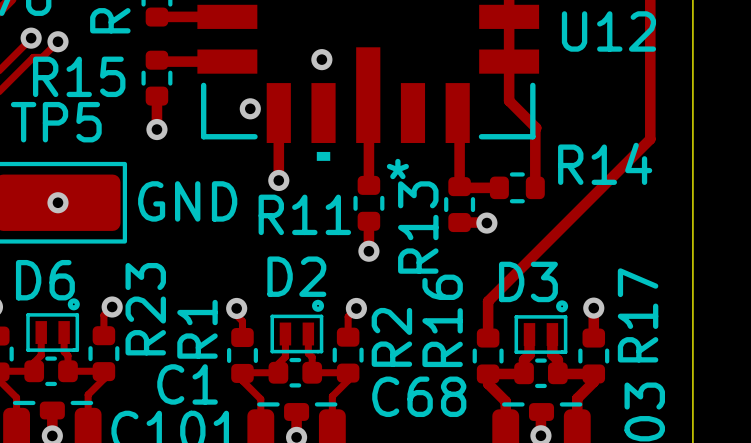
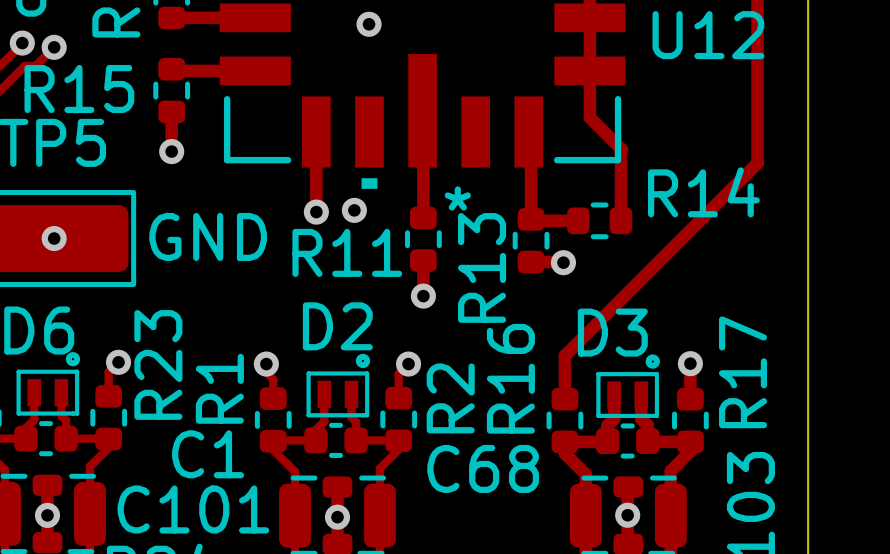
via position: (321, 59) -> (369, 24)
via: (250, 108) -> none
via: none -> (354, 210)

